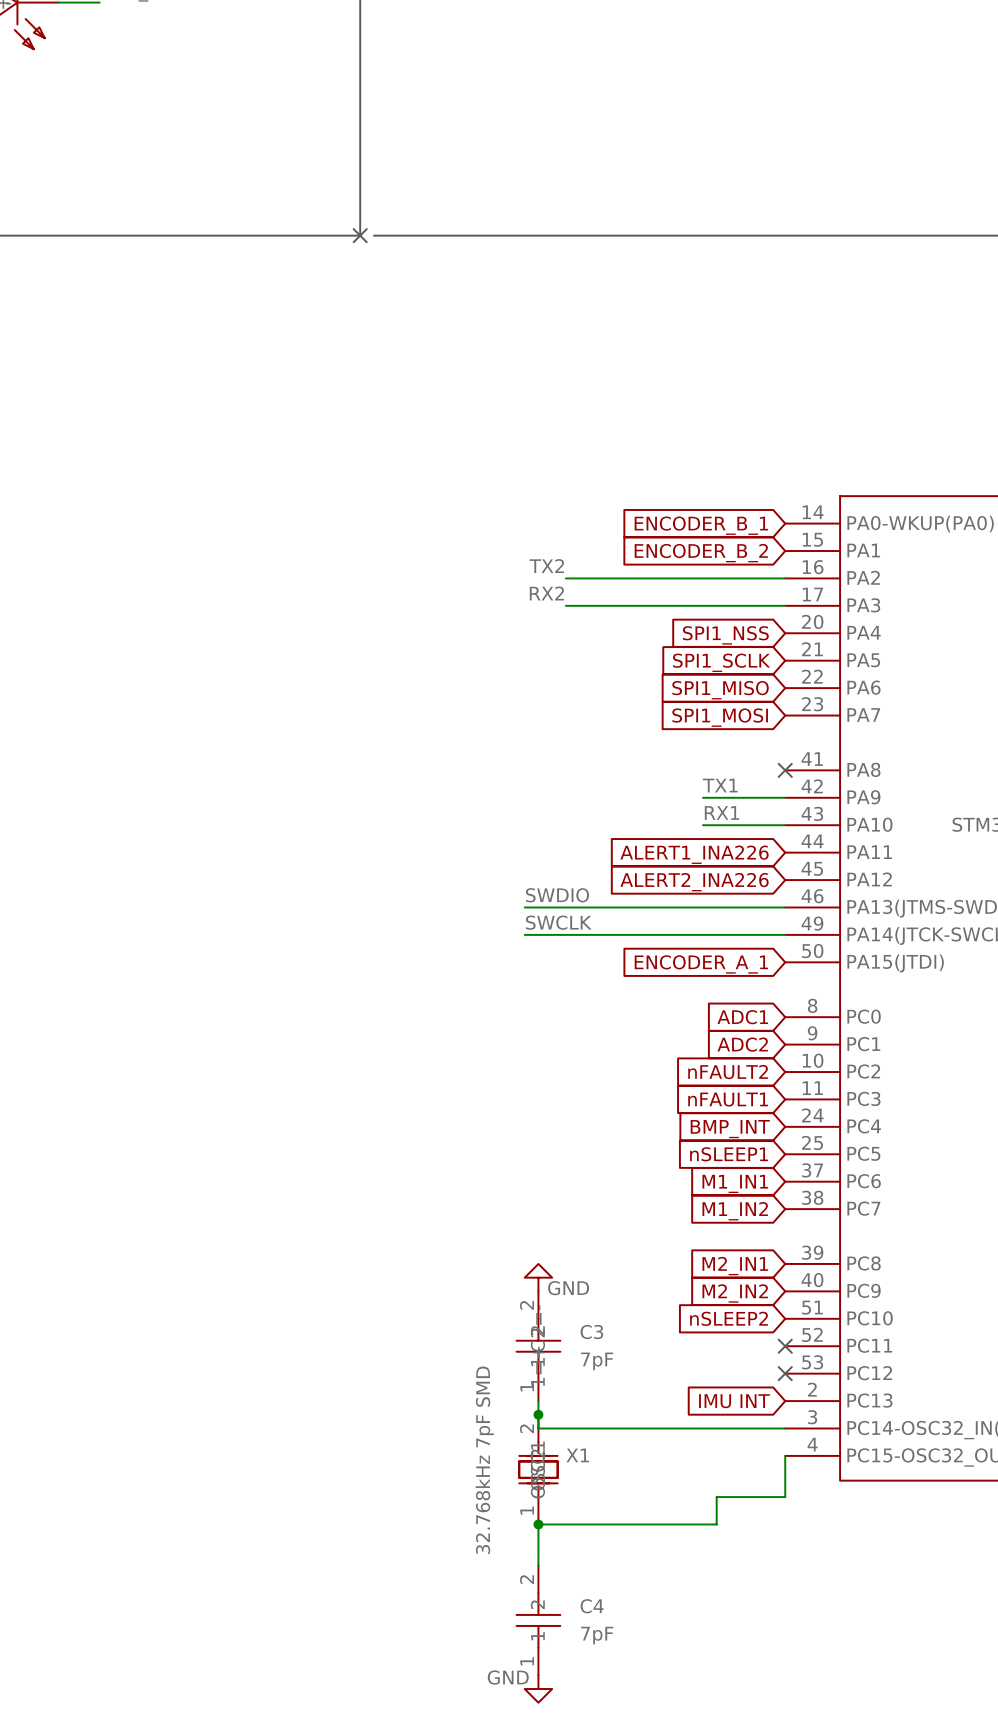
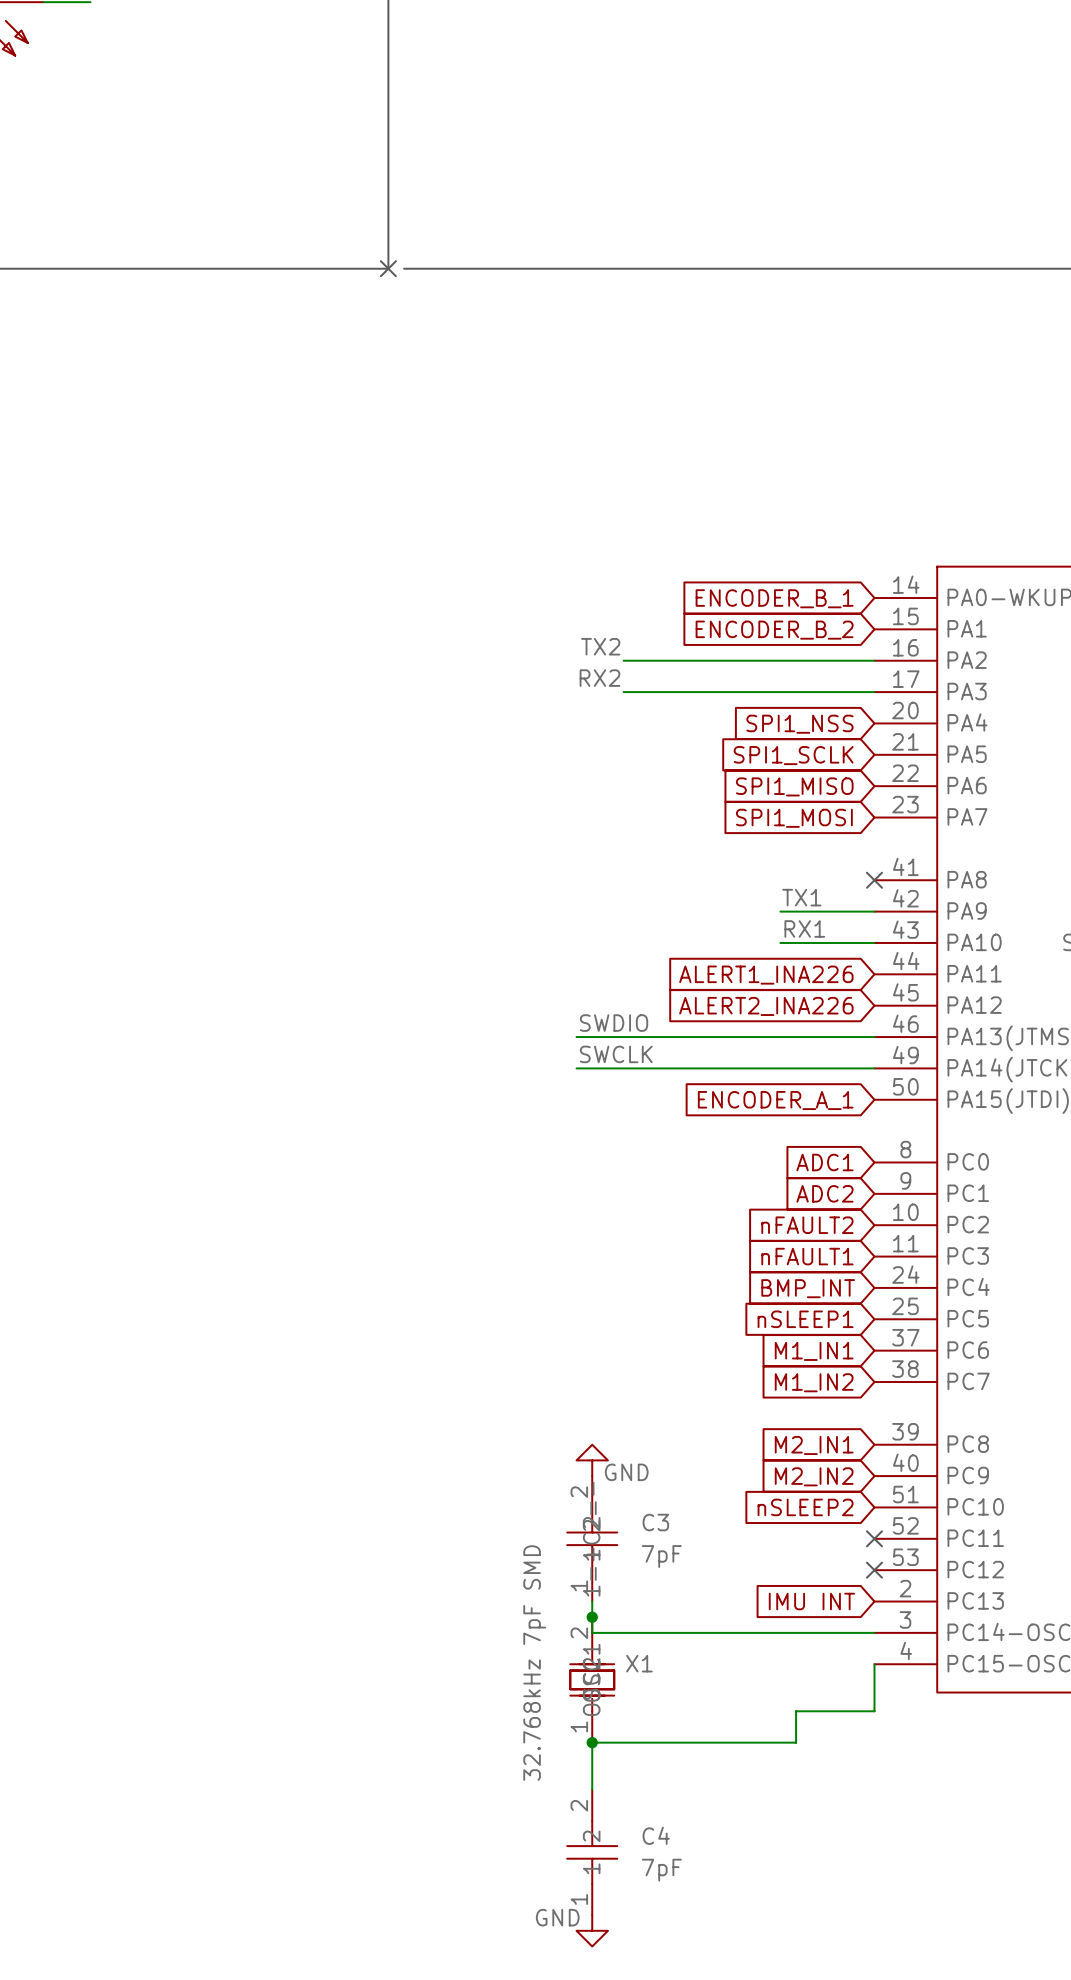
X1 value position: 32.768kHz 7pF SMD (484, 1460) -> 32.768kHz 7pF SMD (534, 1663)

